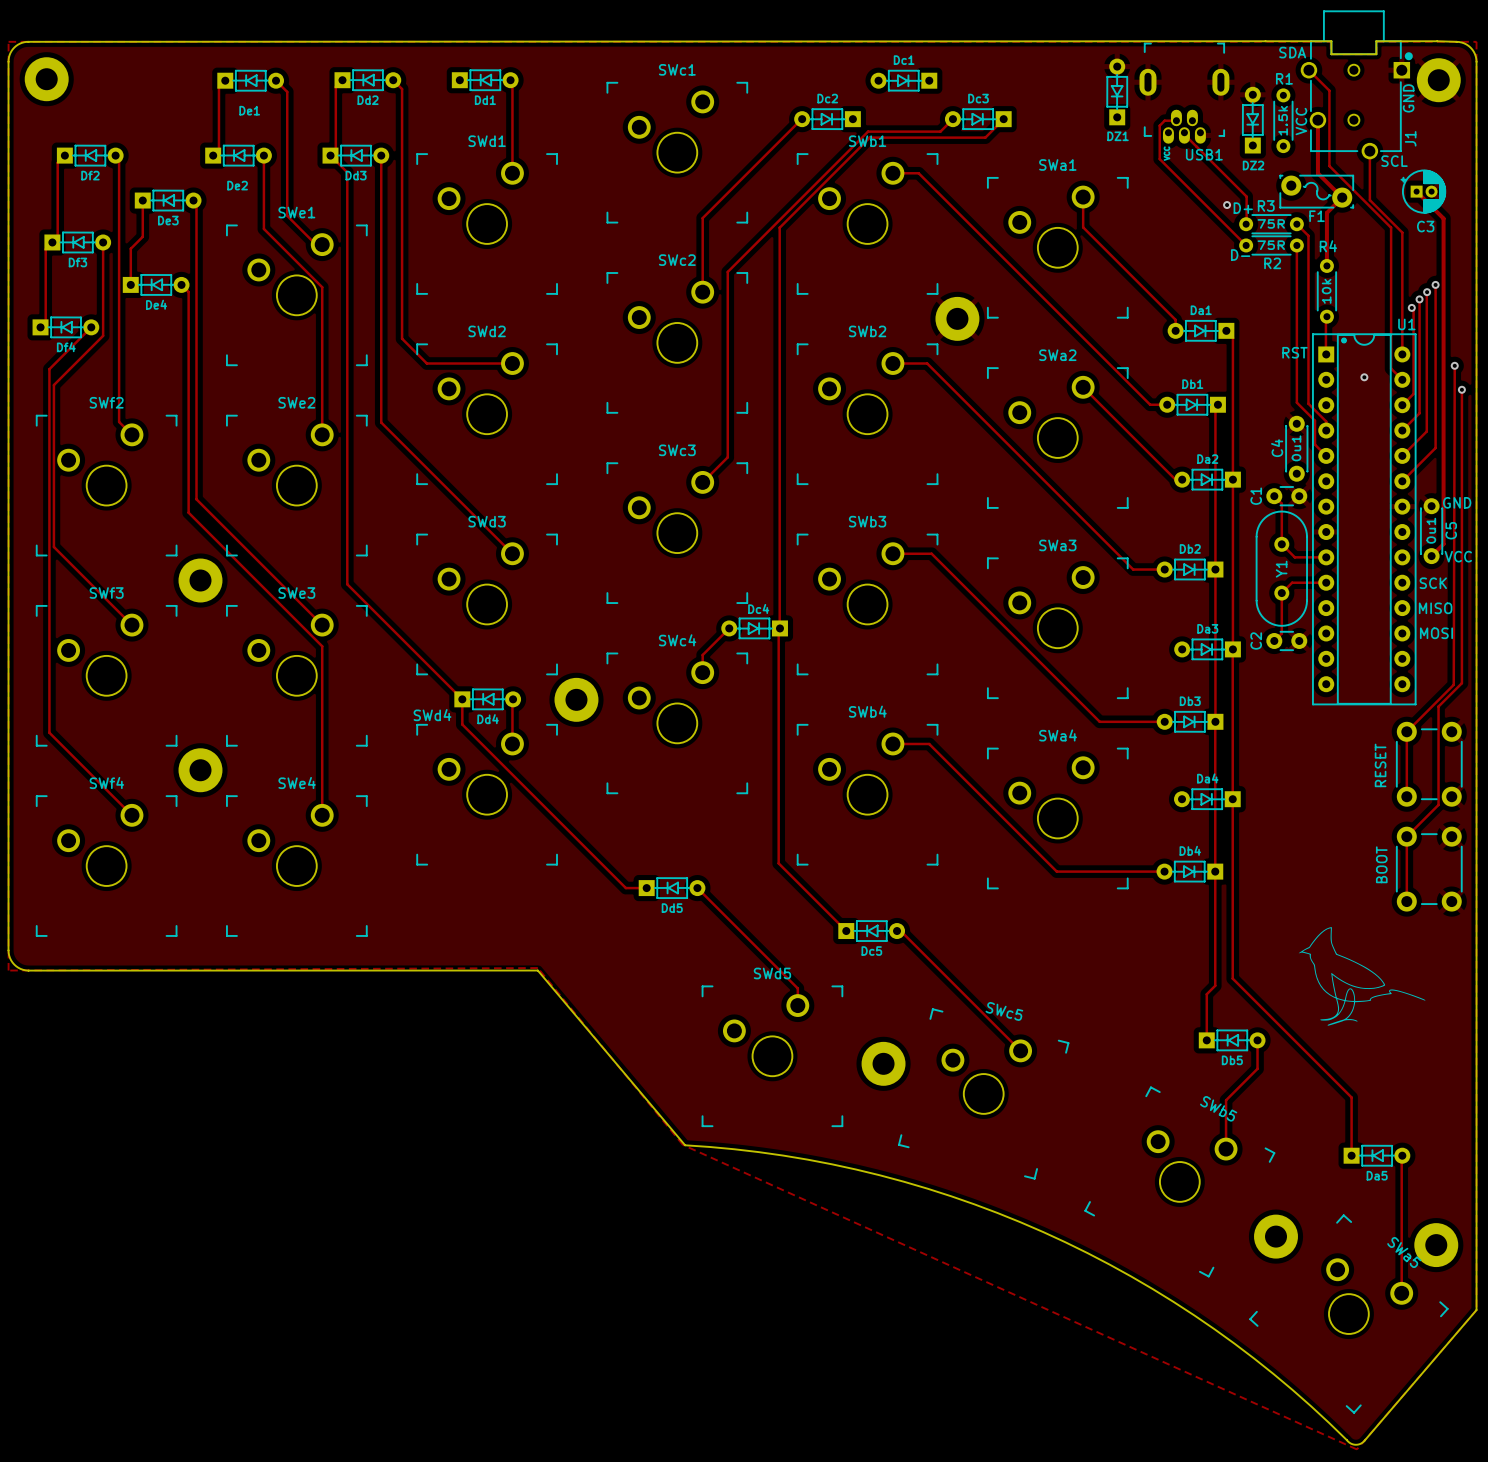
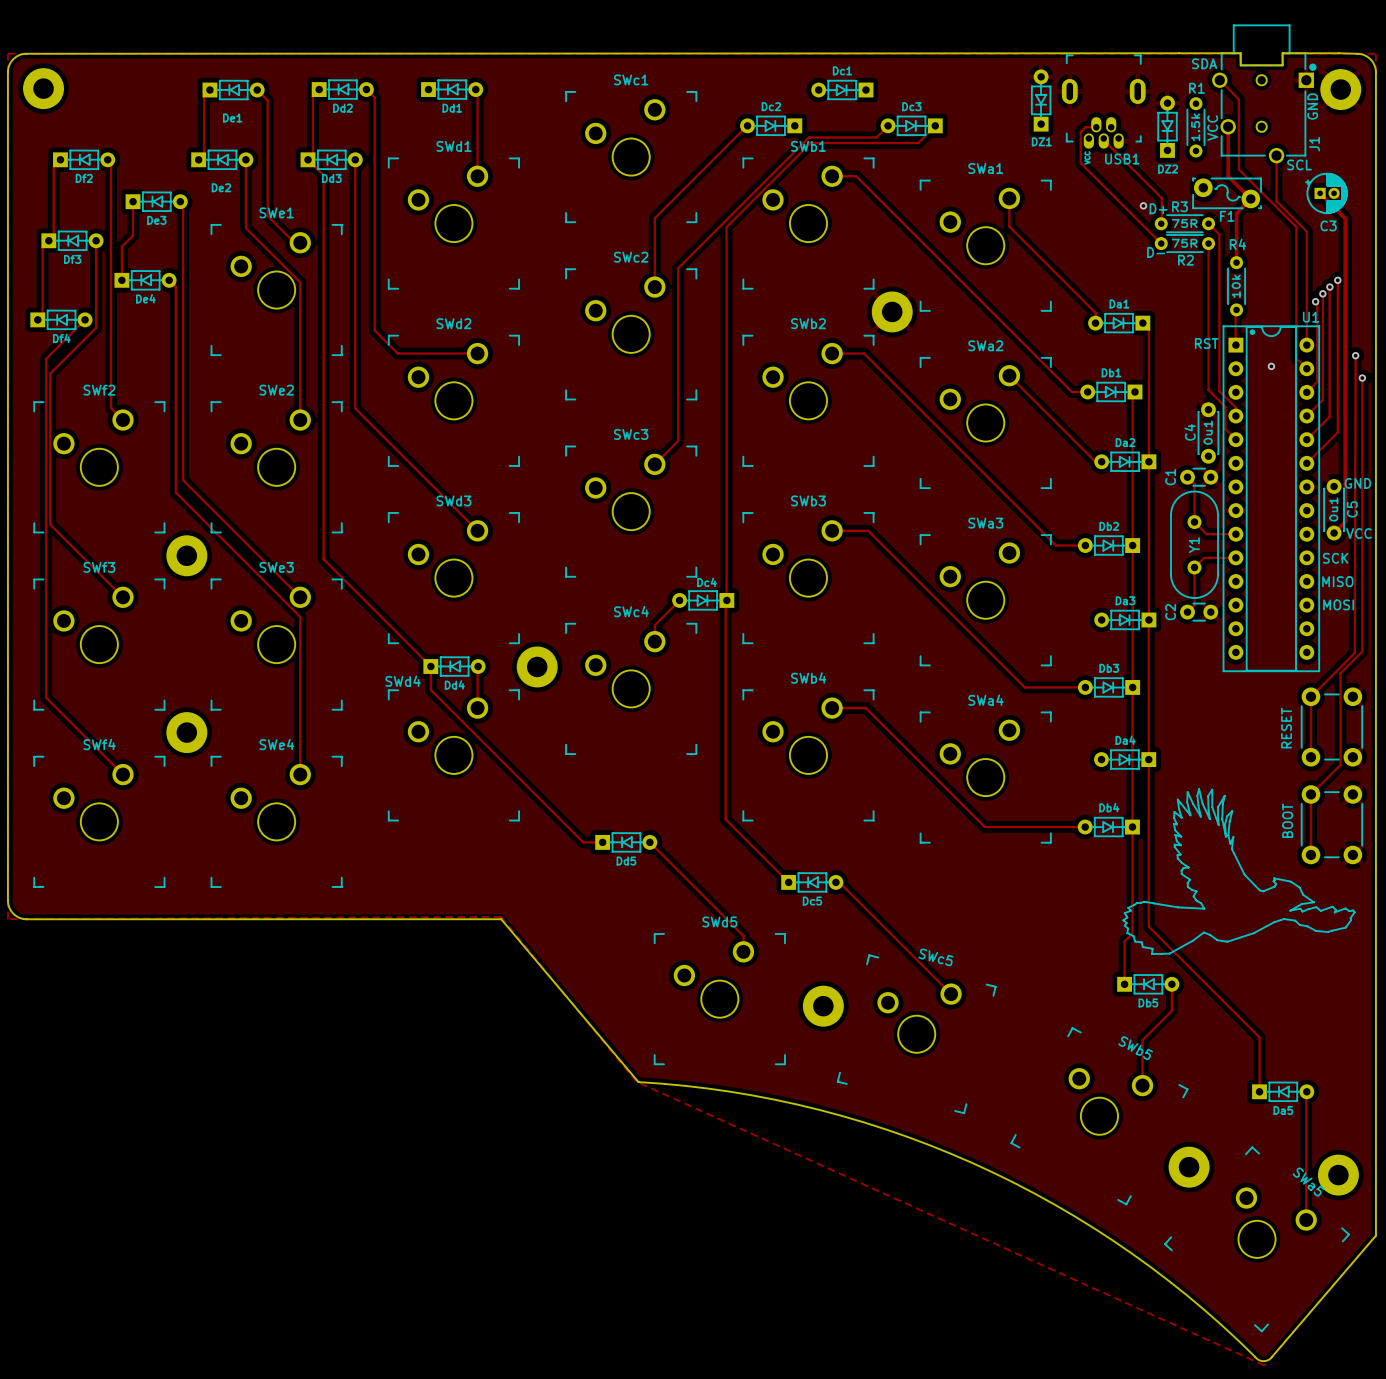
drawing: none -> [1122, 788, 1356, 955]
drawing: [1298, 927, 1426, 1026] -> none

